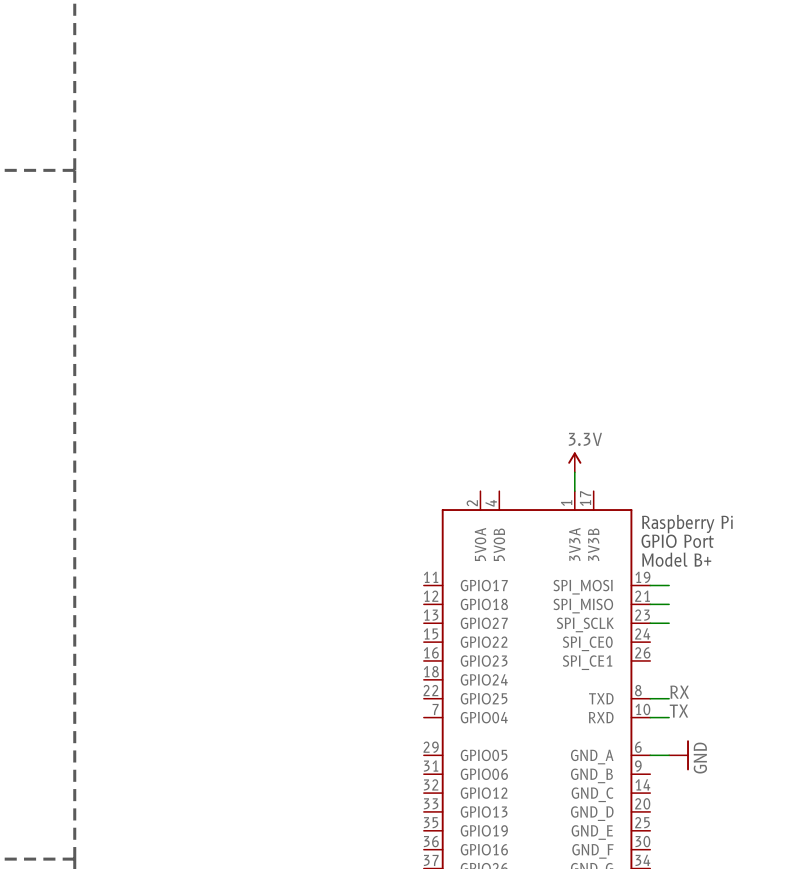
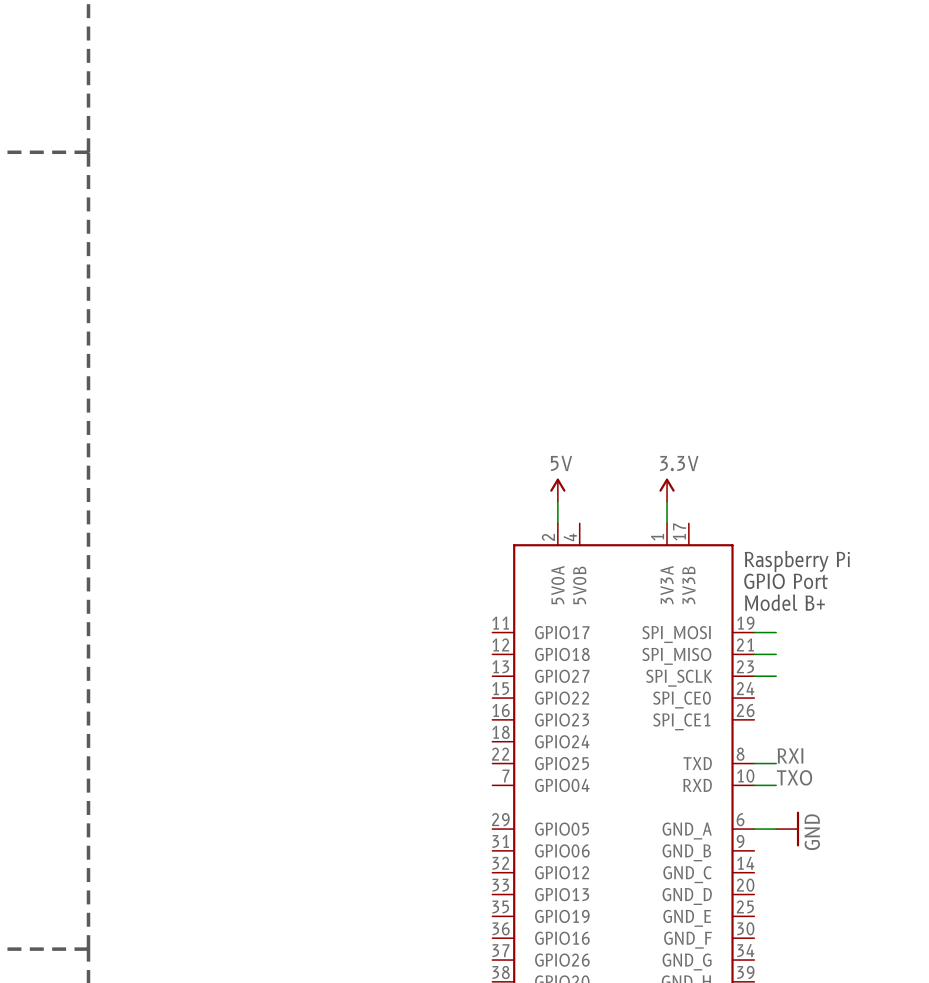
power symbol: none -> 5V (557, 490)
wire: none -> (557, 501) (557, 523)
label: RX (679, 692) -> RXI (790, 755)
label: TX (678, 710) -> TXO (794, 777)

